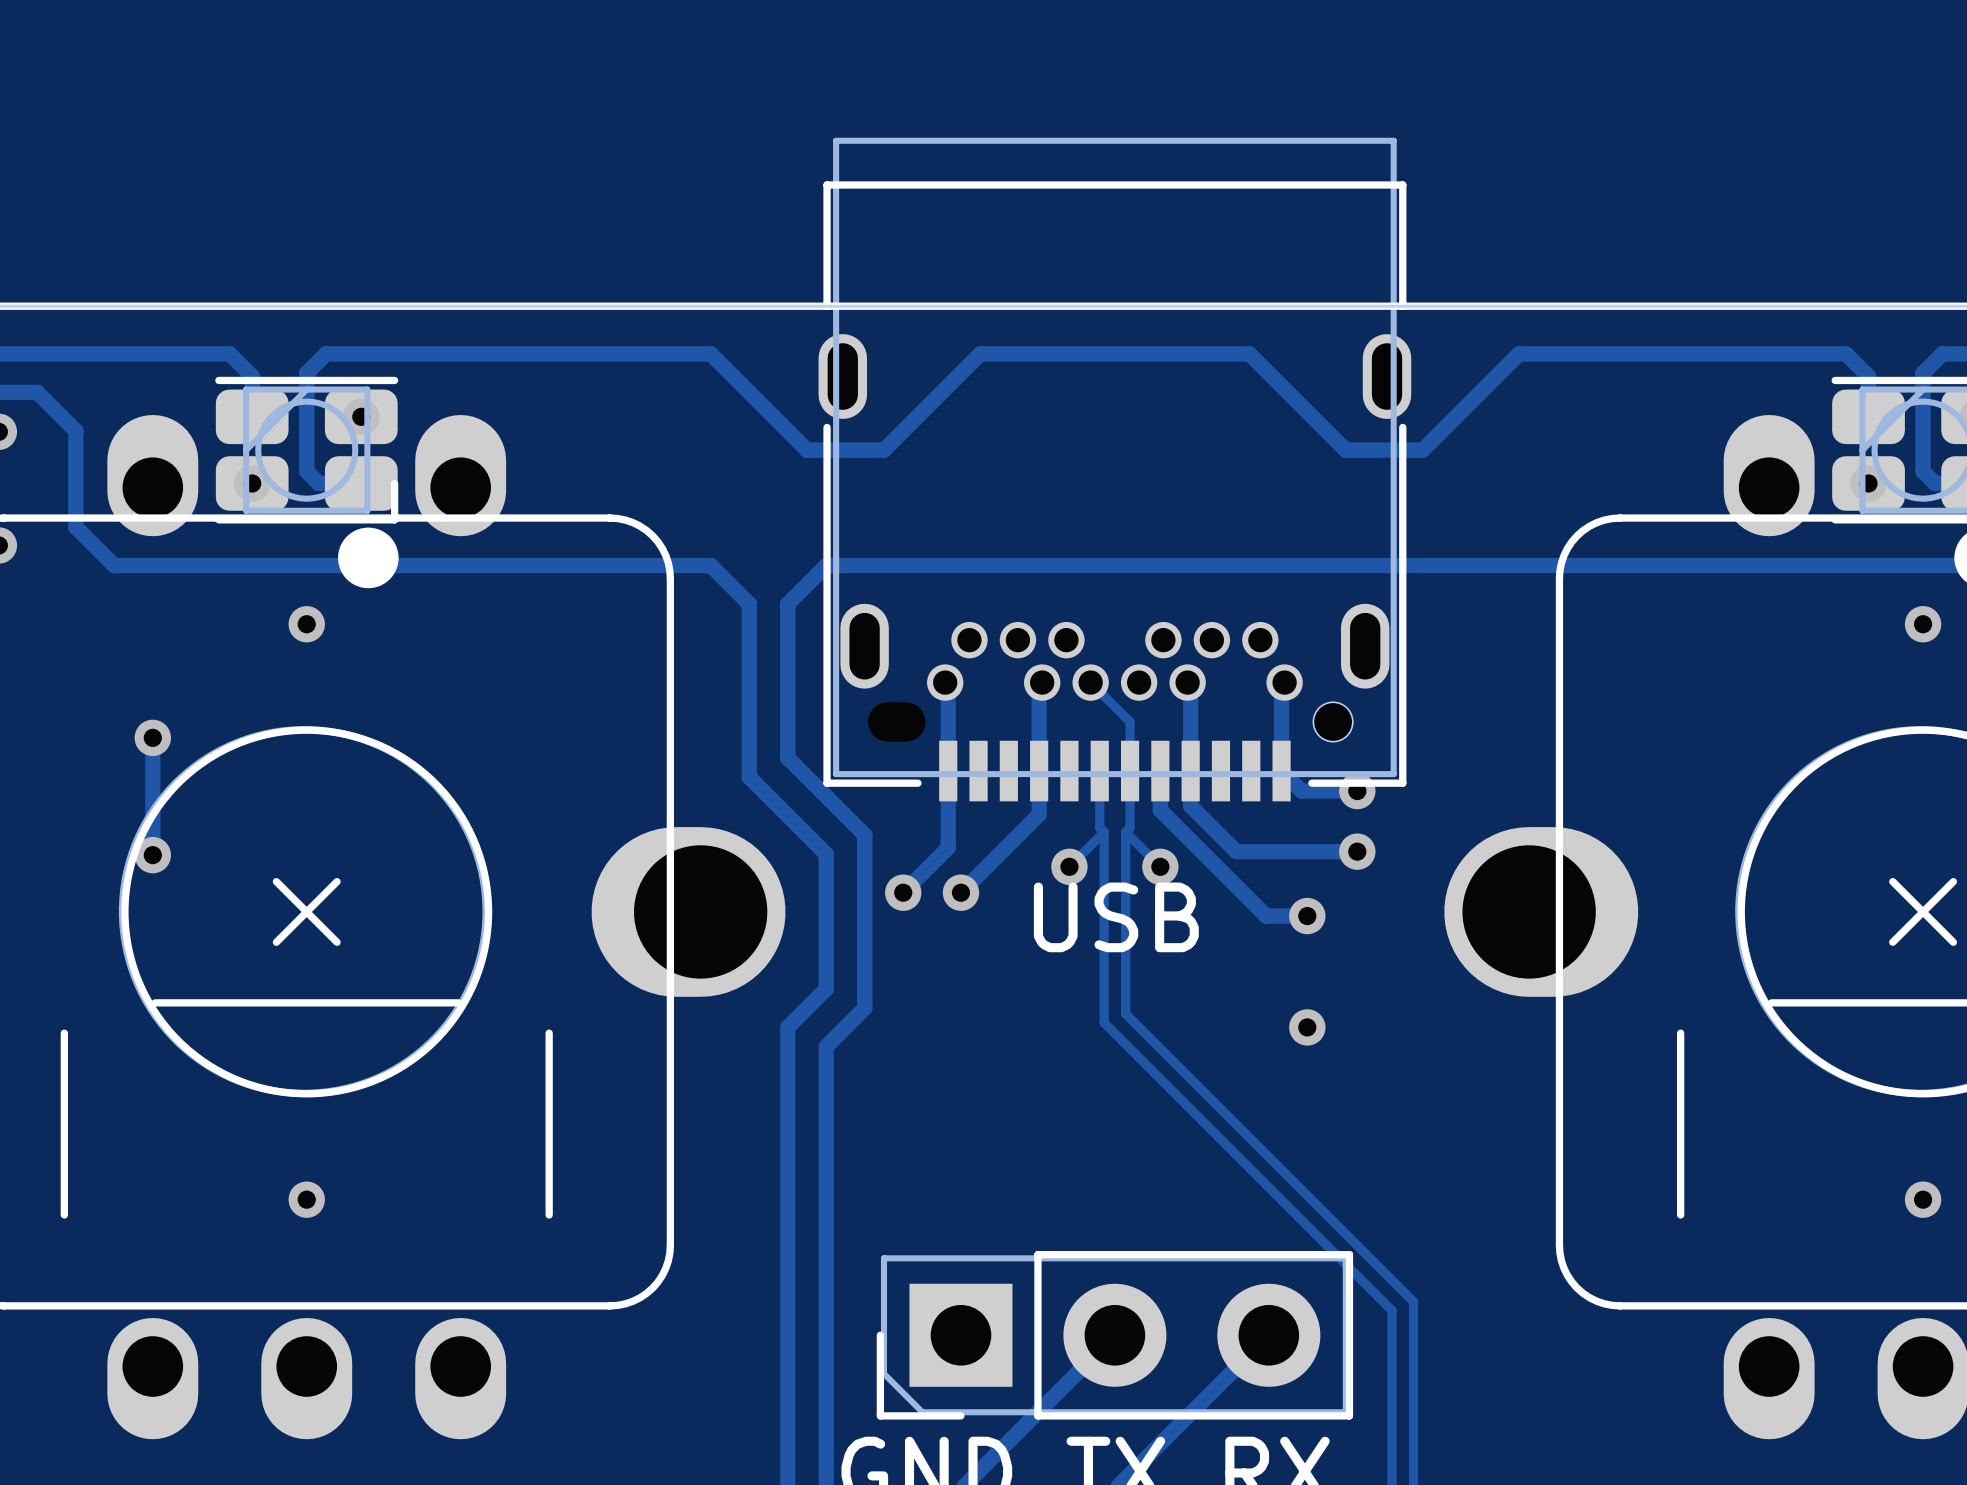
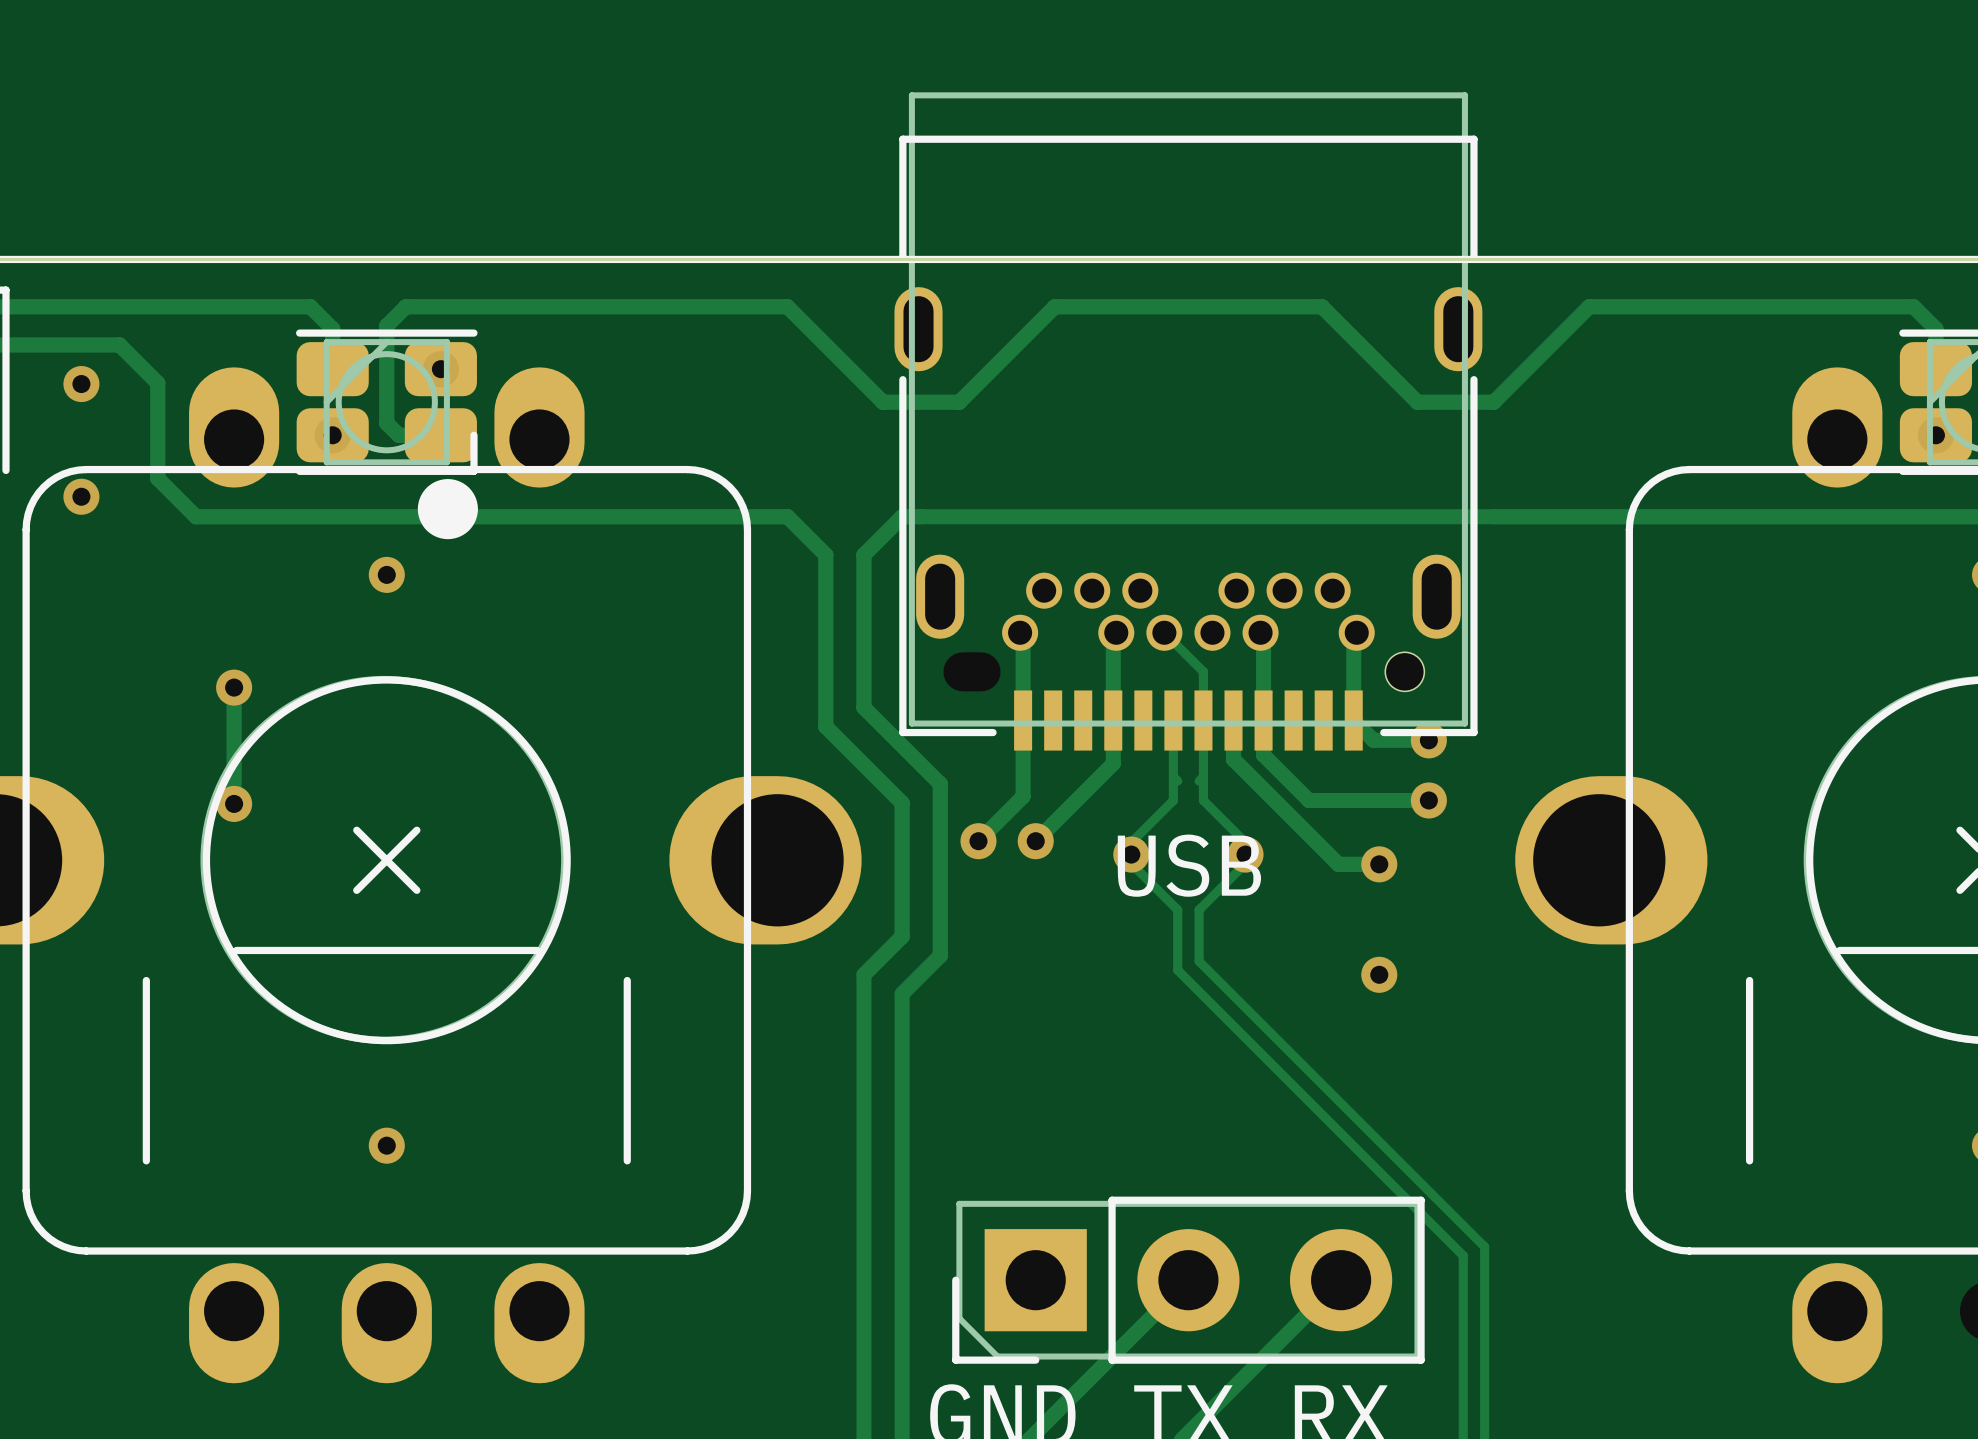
track: (1069, 866) (1104, 832) (1104, 962) -> (1173, 776) (1173, 800) (1131, 842) (1131, 863) (1177, 910)
via position: (1069, 866) -> (1131, 854)
track: (1160, 866) (1125, 832) (1125, 962) -> (1203, 776) (1203, 800) (1245, 842) (1245, 863) (1199, 910)
via position: (1160, 866) -> (1245, 854)

